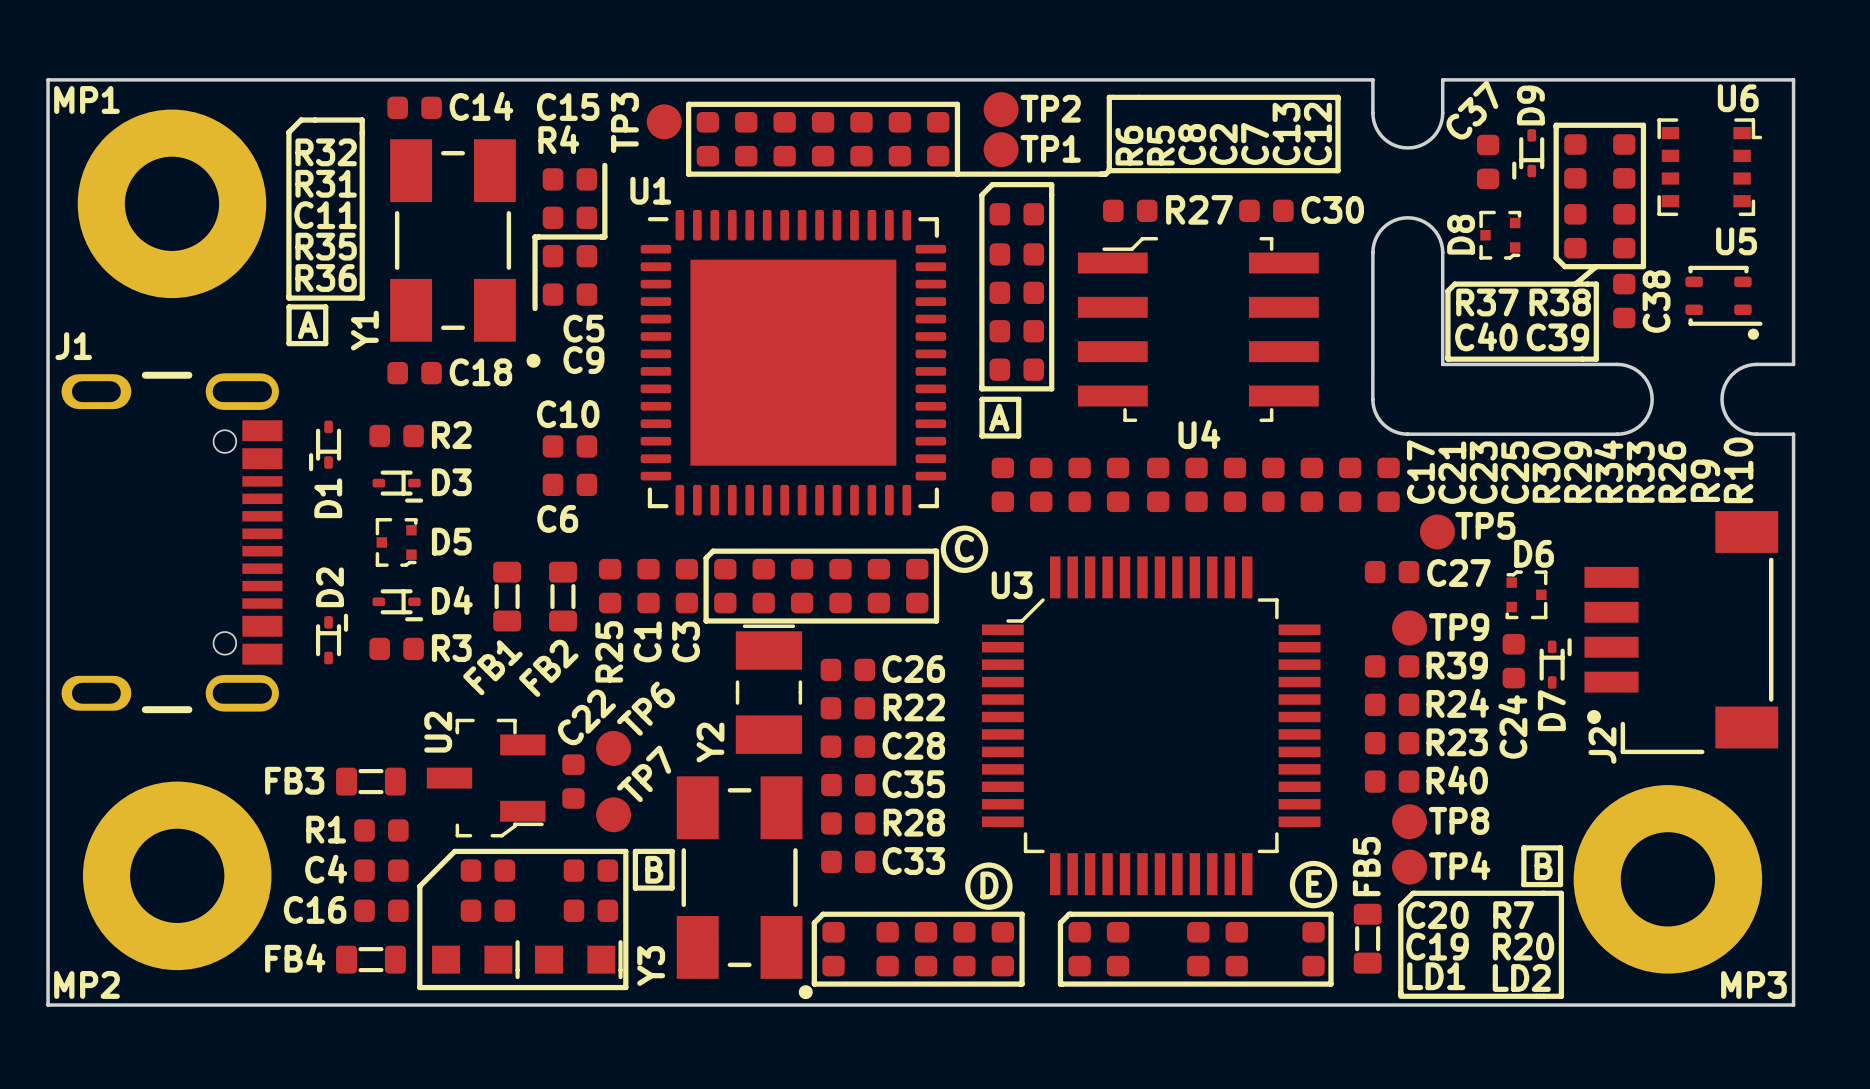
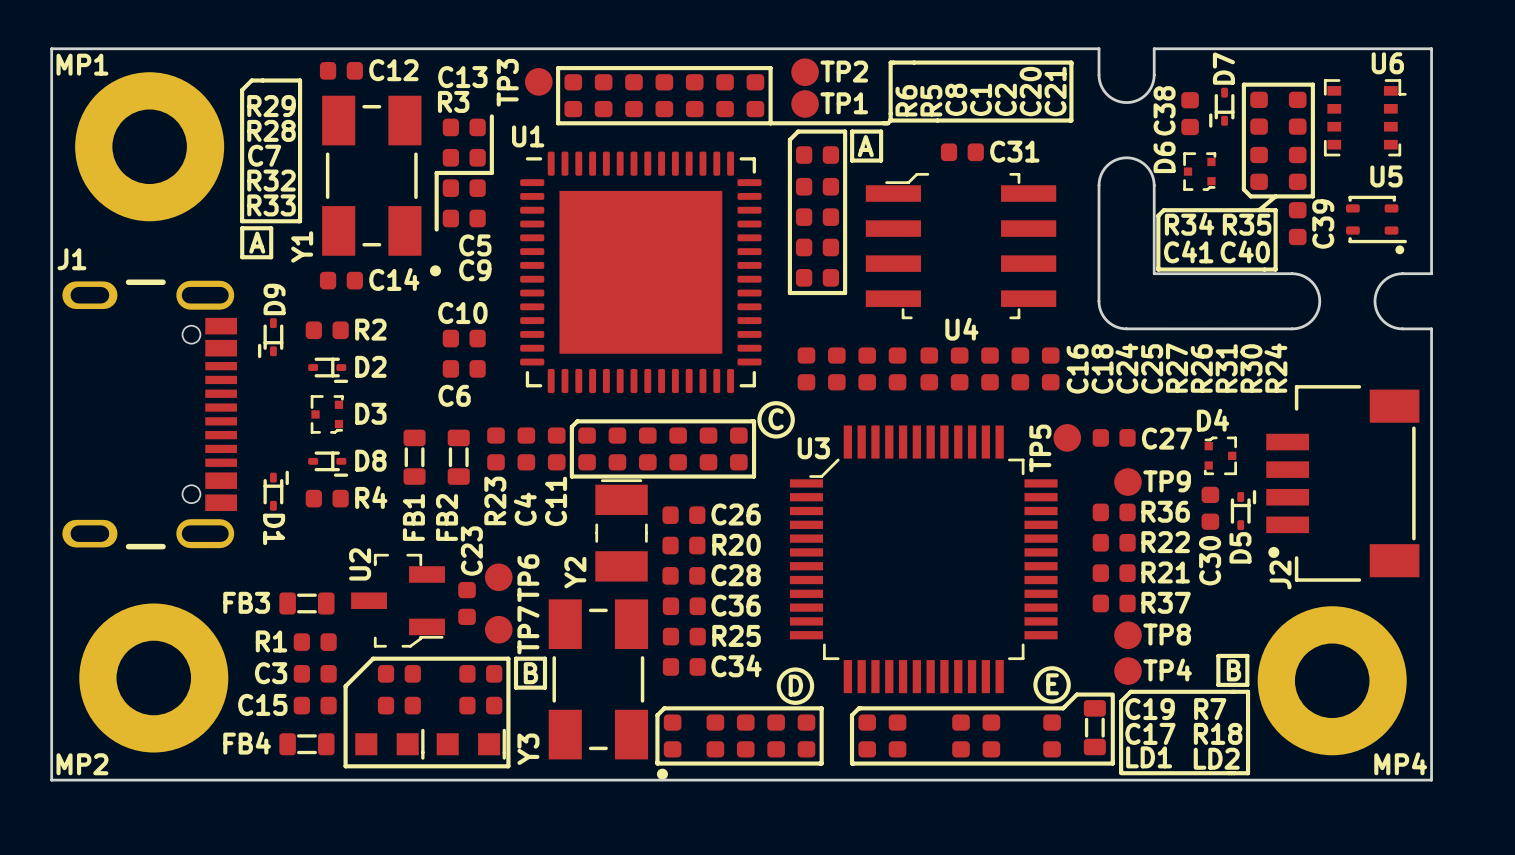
D9 name: D9 (1530, 105) -> D7 (1223, 68)
C14 name: C14 (481, 106) -> C12 (393, 70)
C15 name: C15 (568, 106) -> C13 (462, 77)
C37 name: C37 (1472, 110) -> C38 (1164, 110)
C13 name: C13 (1286, 134) -> C20 (1030, 91)
C12 name: C12 (1317, 134) -> C21 (1055, 91)
R4 name: R4 (558, 139) -> R3 (453, 101)
C7 name: C7 (1255, 143) -> C2 (1005, 99)
C2 name: C2 (1223, 144) -> C1 (981, 99)
R32 name: R32 (326, 152) -> R29 (271, 106)
R31 name: R31 (326, 183) -> R28 (271, 130)
R27: (1130, 210) -> none
C31: none -> (962, 152)
C30: (1266, 210) -> none
C11 name: C11 (325, 215) -> C7 (264, 155)
D8 name: D8 (1461, 234) -> D6 (1164, 157)
R35 name: R35 (326, 246) -> R32 (271, 180)
R36 name: R36 (326, 278) -> R33 (271, 205)
C38 name: C38 (1656, 301) -> C39 (1323, 224)
R37 name: R37 (1487, 302) -> R34 (1189, 224)
R38 name: R38 (1560, 302) -> R35 (1247, 224)
C40 name: C40 (1486, 336) -> C41 (1188, 251)
C39 name: C39 (1557, 337) -> C40 (1245, 251)
C18 name: C18 (480, 372) -> C14 (394, 279)
line: (982, 399) (1018, 399) (1018, 435) (982, 435) (982, 399) -> (852, 131) (881, 131) (881, 160) (852, 160) (852, 131)
text position: A (999, 417) -> A (865, 146)
R34 name: R34 (1608, 471) -> R31 (1226, 368)
C17 name: C17 (1420, 472) -> C16 (1077, 368)
C21 name: C21 (1452, 472) -> C18 (1102, 368)
C23 name: C23 (1483, 472) -> C24 (1126, 368)
C25 name position: C25 (1515, 472) -> C25 (1152, 368)
R30 name: R30 (1546, 472) -> R27 (1176, 368)
R29 name: R29 (1578, 472) -> R26 (1201, 368)
R33 name: R33 (1640, 472) -> R30 (1251, 368)
R26 name: R26 (1672, 472) -> R24 (1275, 368)
D3 name: D3 (451, 482) -> D2 (370, 366)
R9: (1350, 484) -> none
R10: (1388, 484) -> none
D1 name: D1 (328, 498) -> D9 (274, 299)
J2 footprint: [1584, 511, 1779, 755] -> [1266, 385, 1420, 582]
TP5 name rotation: 0° (1485, 525) -> 90° counterclockwise (1040, 448)
TP5 name position: TP5 (1485, 525) -> TP5 (1040, 448)
TP5 position: (1437, 531) -> (1067, 437)
D5 name: D5 (451, 541) -> D3 (370, 413)
D6 name: D6 (1534, 553) -> D4 (1213, 420)
D2 name: D2 (329, 587) -> D1 (274, 529)
D4 name: D4 (452, 600) -> D8 (370, 460)
C1 name: C1 (647, 641) -> C4 (525, 509)
C3 name: C3 (686, 641) -> C11 (556, 501)
R3 name: R3 (451, 648) -> R4 (371, 497)
R25 name: R25 (609, 651) -> R23 (495, 500)
R39 name: R39 (1457, 665) -> R36 (1165, 511)
FB1 name rotation: 0° (492, 667) -> 45° counterclockwise (413, 517)
FB2 name rotation: 0° (548, 668) -> 45° counterclockwise (447, 517)
R24 name: R24 (1457, 703) -> R22 (1165, 542)
R22 name: R22 (914, 707) -> R20 (736, 544)
TP6 name rotation: 0° (645, 708) -> 45° counterclockwise (528, 578)
D7 name: D7 (1551, 710) -> D5 (1240, 547)
C22 name: C22 (586, 717) -> C23 (471, 551)
C24 name: C24 (1512, 726) -> C30 (1210, 560)
R23 name: R23 (1457, 742) -> R21 (1165, 572)
TP7 name rotation: 0° (644, 773) -> 45° counterclockwise (528, 630)
Y3 footprint: [676, 776, 813, 1000] -> [548, 599, 668, 780]
R40 name: R40 (1457, 780) -> R37 (1166, 602)
C35 name: C35 (913, 784) -> C36 (736, 605)
R28 name: R28 (914, 822) -> R25 (736, 635)
C33 name: C33 (913, 861) -> C34 (736, 665)
FB5 name: FB5 (1366, 866) -> none
C4 name: C4 (326, 869) -> C3 (271, 673)
line: none -> (1111, 694) (1076, 694) (1063, 708)
C16 name: C16 (315, 909) -> C15 (262, 704)
line: (1327, 914) (1331, 914) (1331, 984) -> (1112, 694) (1112, 763) (1065, 763)
C20 name: C20 (1437, 915) -> C19 (1150, 709)
C19 name: C19 (1437, 946) -> C17 (1150, 733)
R20 name: R20 (1523, 946) -> R18 (1218, 733)
MP3 name: MP3 (1753, 984) -> MP4 (1400, 763)

